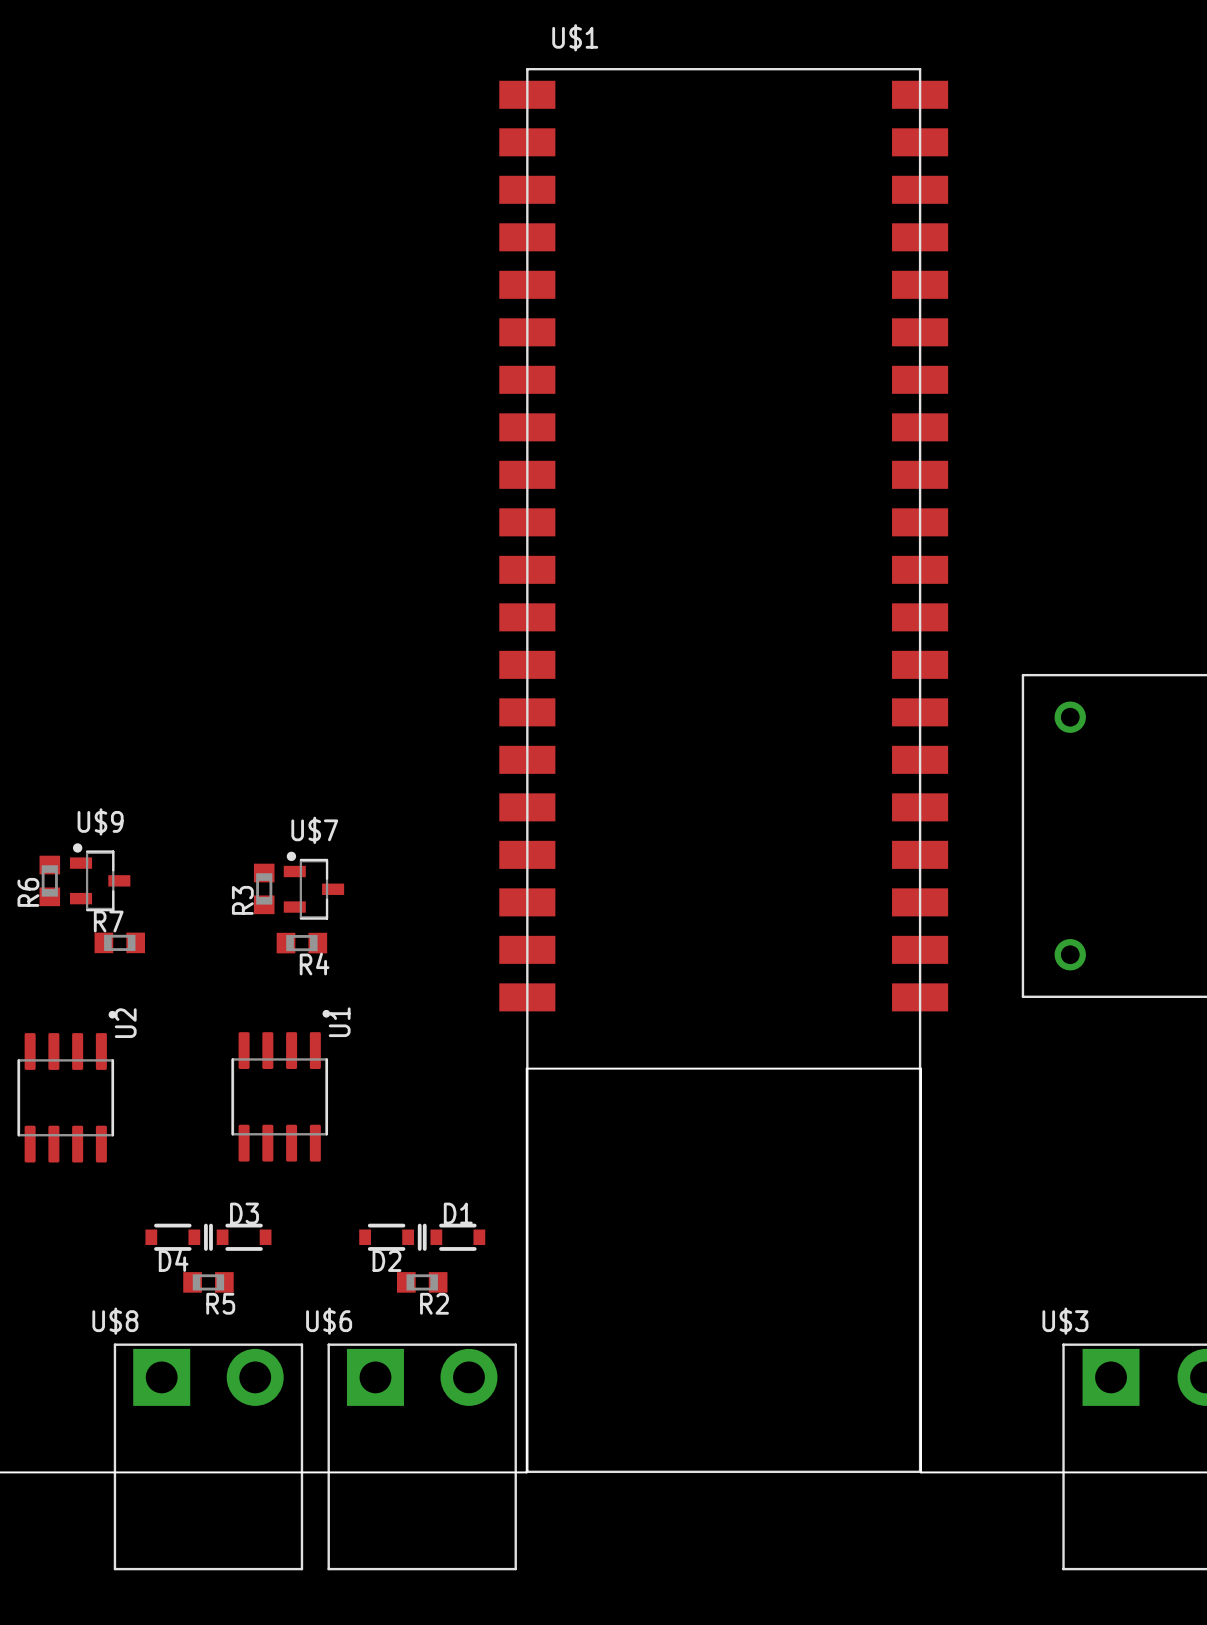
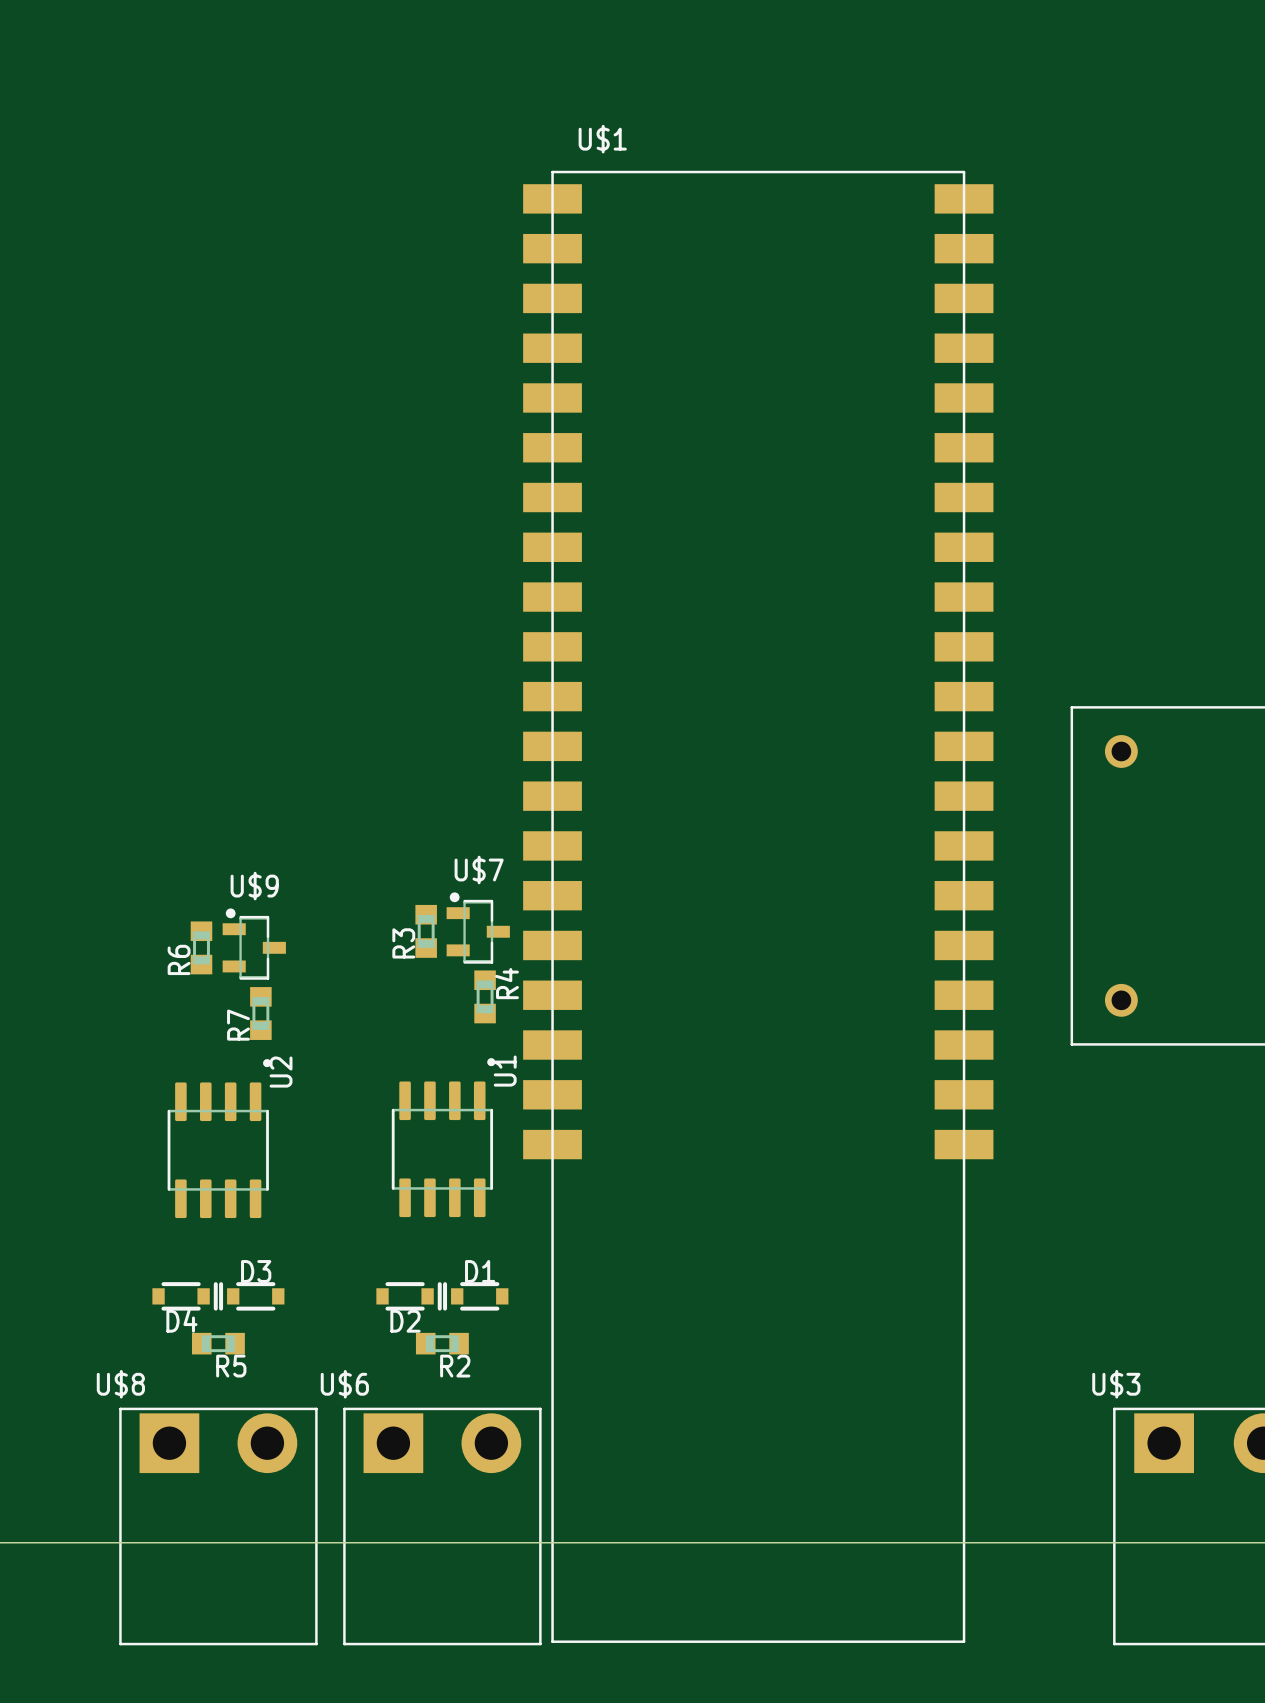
U$1 position: (723, 770) -> (758, 906)
U$9 position: (100, 877) -> (254, 944)
R6 position: (49, 880) -> (201, 947)
U$7 position: (313, 885) -> (478, 928)
R3 position: (264, 888) -> (426, 931)
R7 rotation: 0° (119, 942) -> 90° clockwise (260, 1013)
R7 position: (119, 942) -> (260, 1013)
R4 rotation: 0° (301, 943) -> 90° clockwise (485, 996)
R4 position: (301, 943) -> (485, 996)
U1 position: (280, 1085) -> (443, 1137)
U2 position: (66, 1086) -> (219, 1138)
board edge: (526, 1472) (526, 1068) (921, 1068) (921, 1472) -> (551, 1542) (965, 1542)

